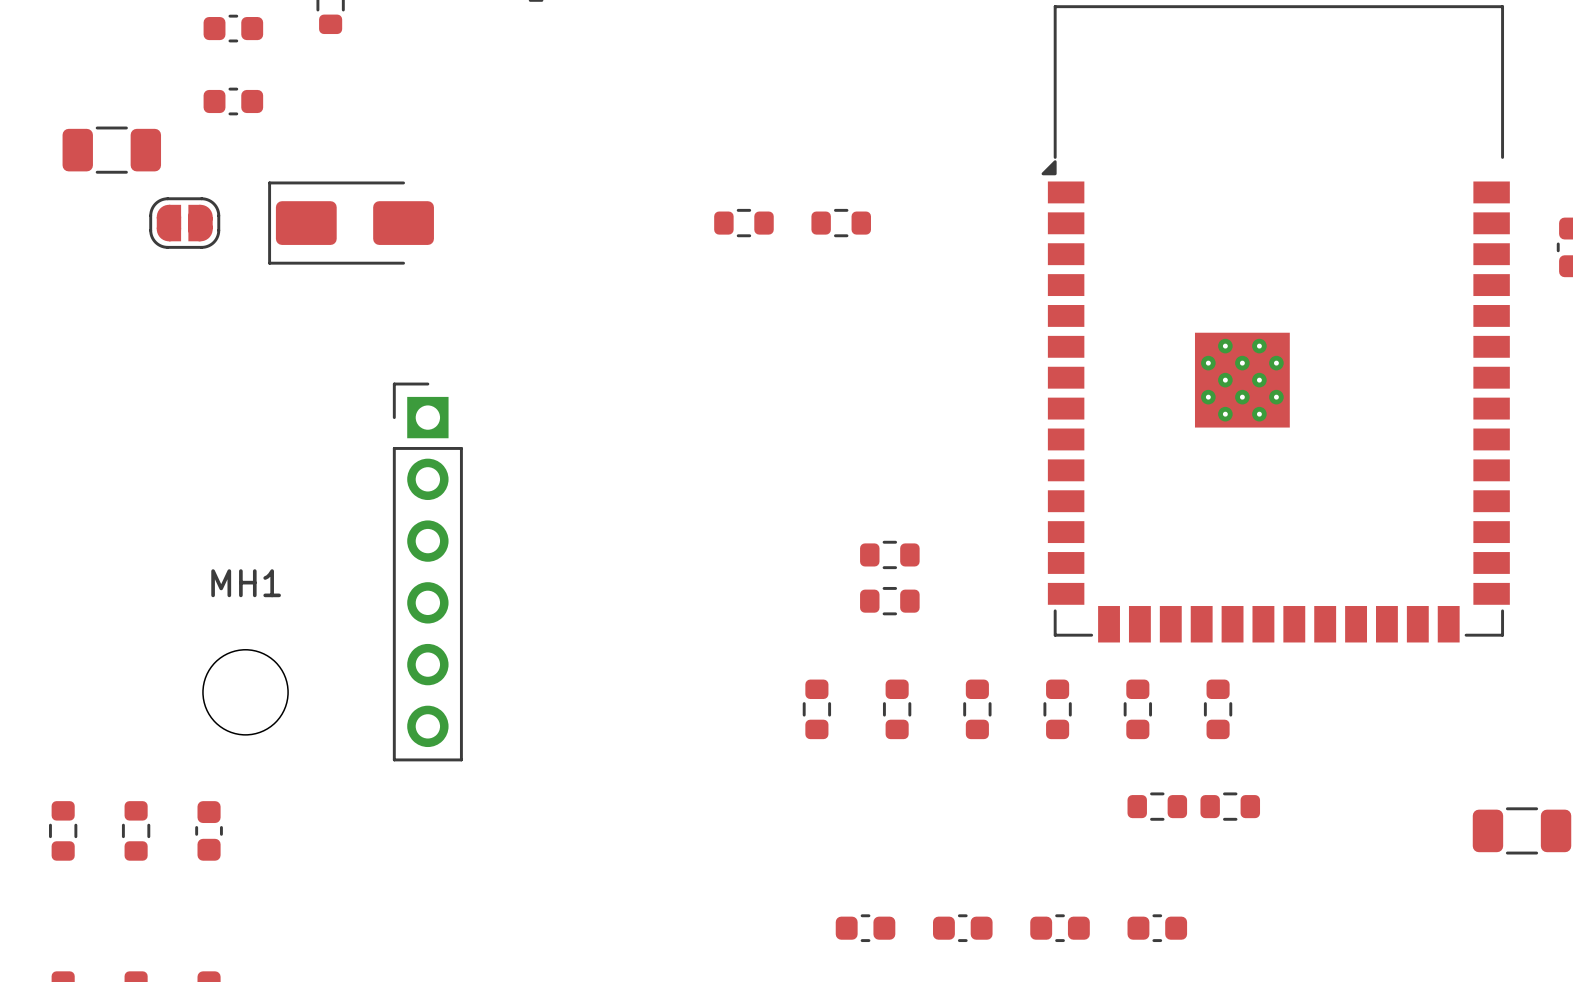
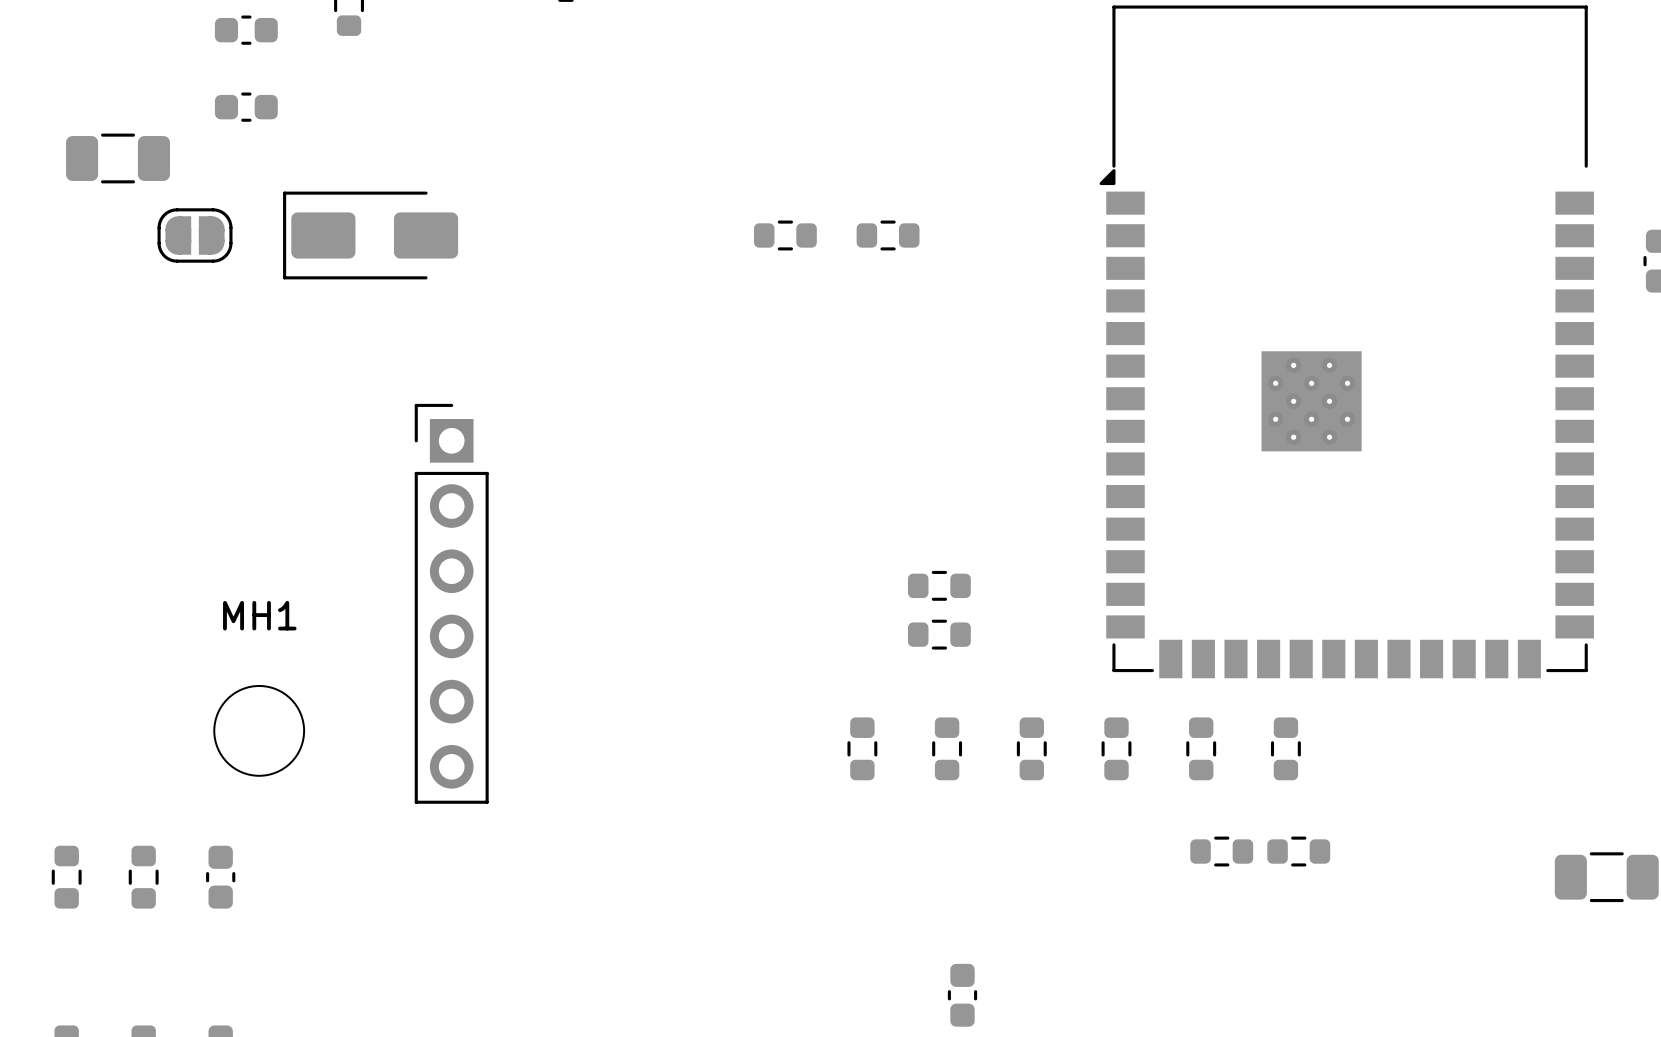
part: (865, 928) -> none
part: (962, 928) -> none
part: (1060, 928) -> none
part: (1157, 928) -> none
part: none -> (962, 995)

